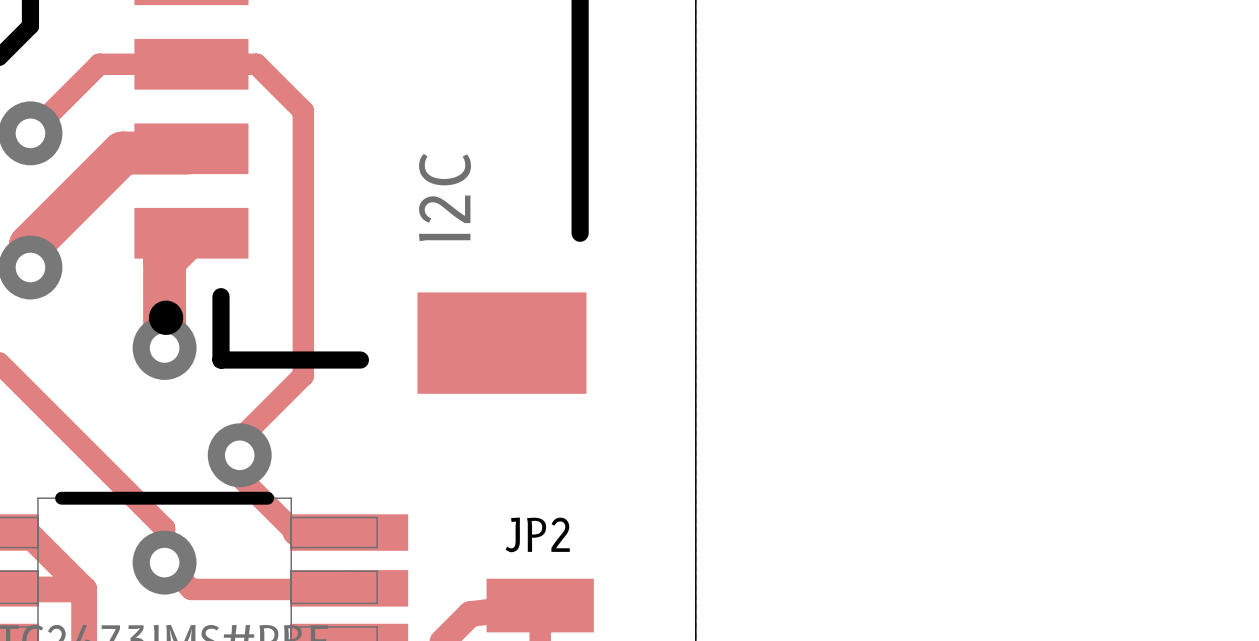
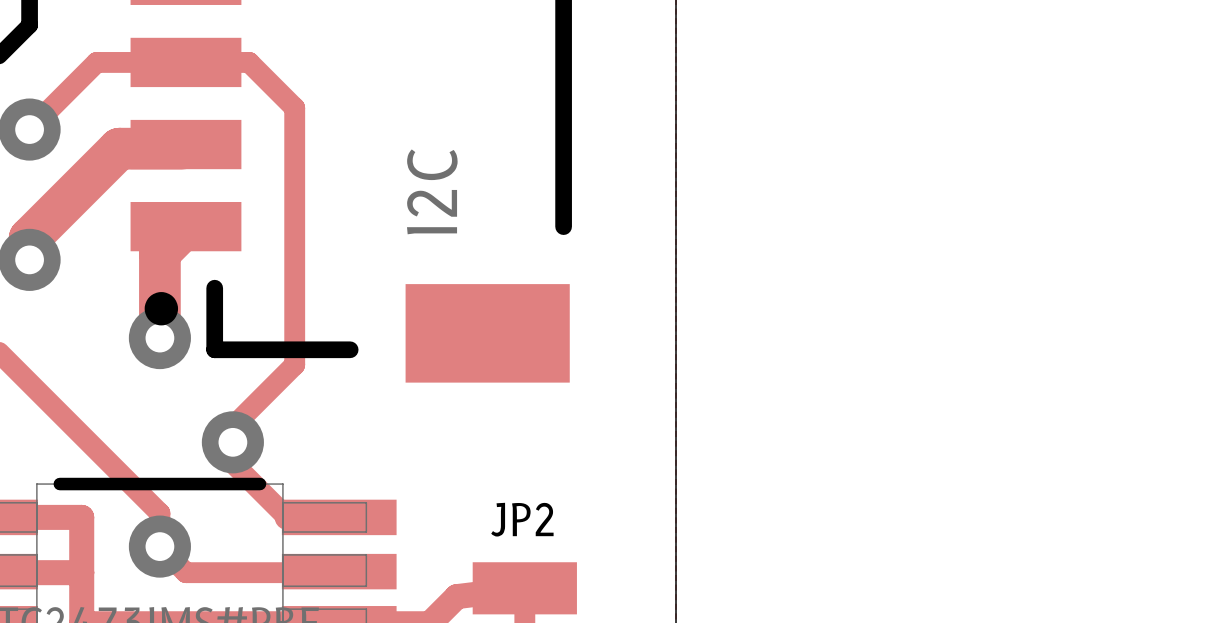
track: (27, 532) (84, 589) -> (26, 517) (81, 517) (81, 572)

